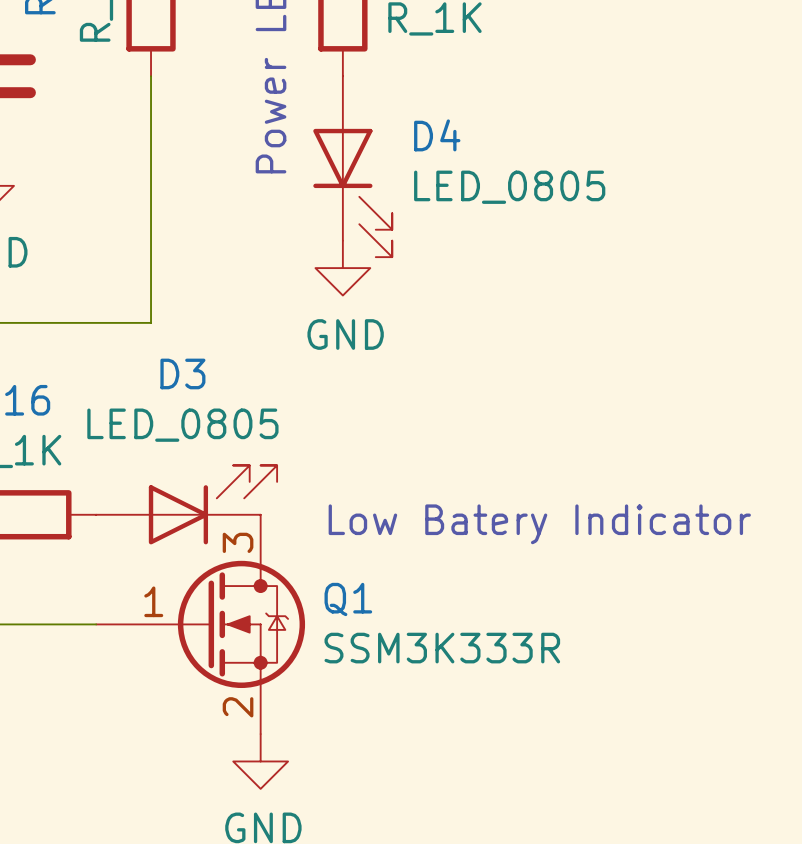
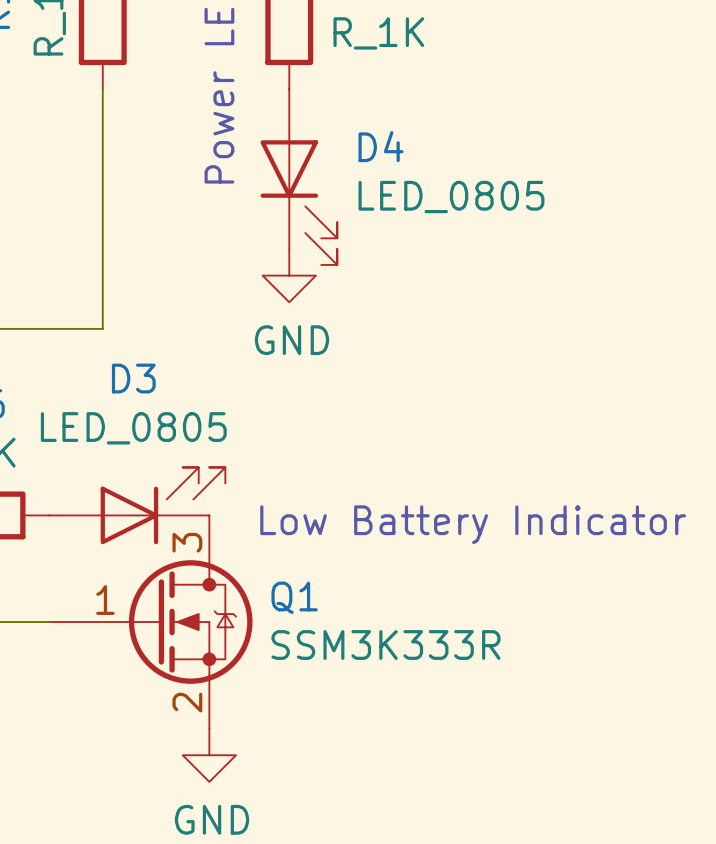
text: Low Batery Indicator (539, 524) -> Low Battery Indicator (473, 524)

